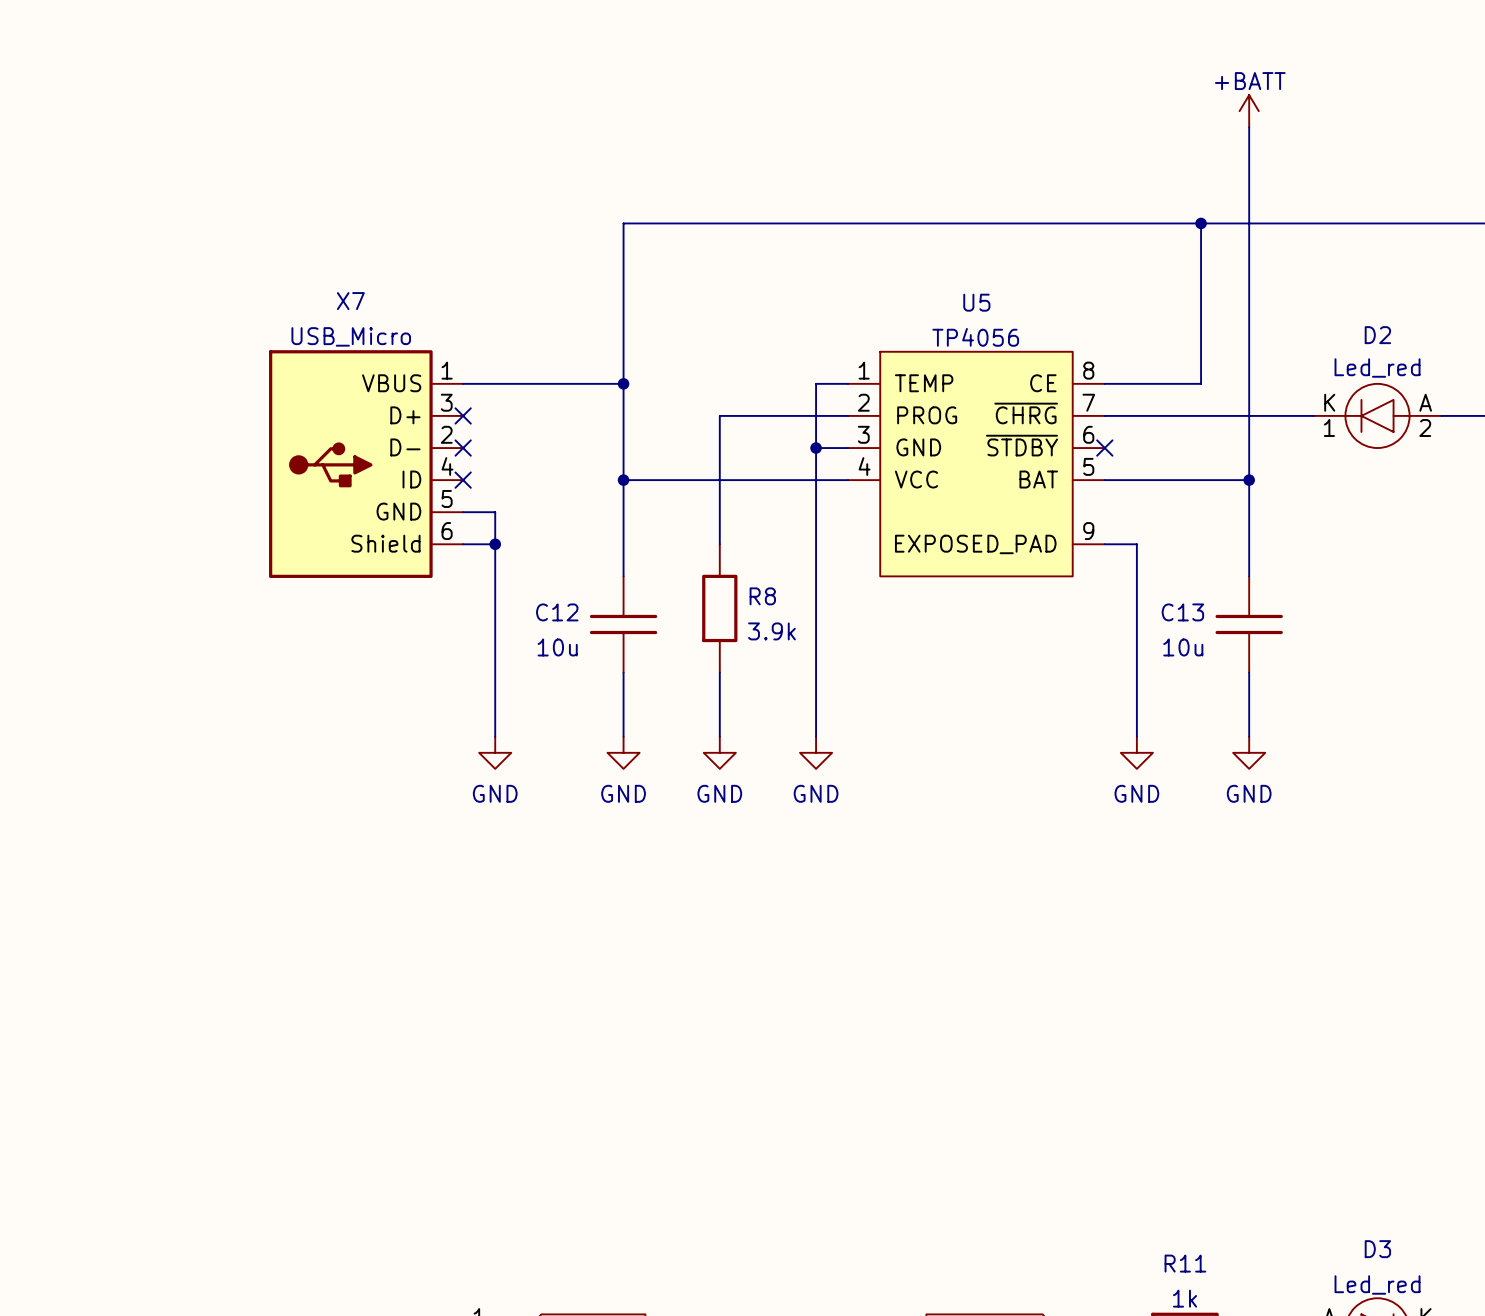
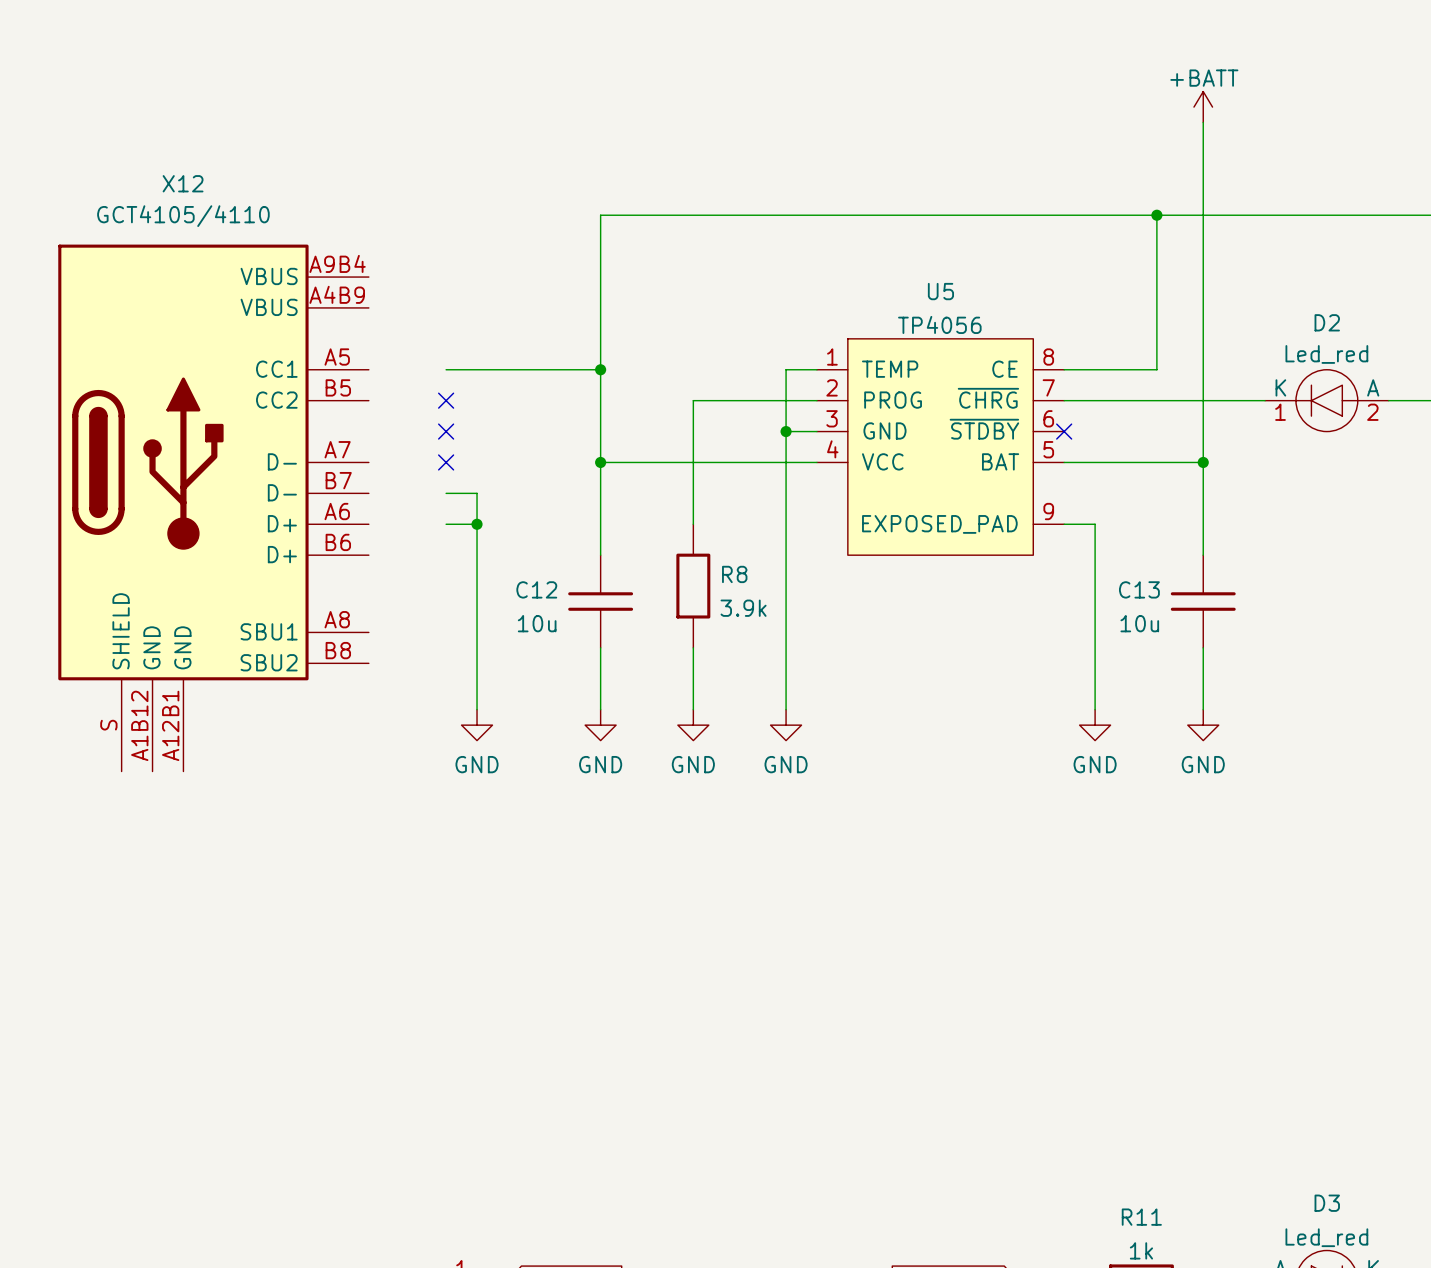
X7: USB_Micro (366, 464) -> none
X12: none -> GCT4105/4110 (213, 508)

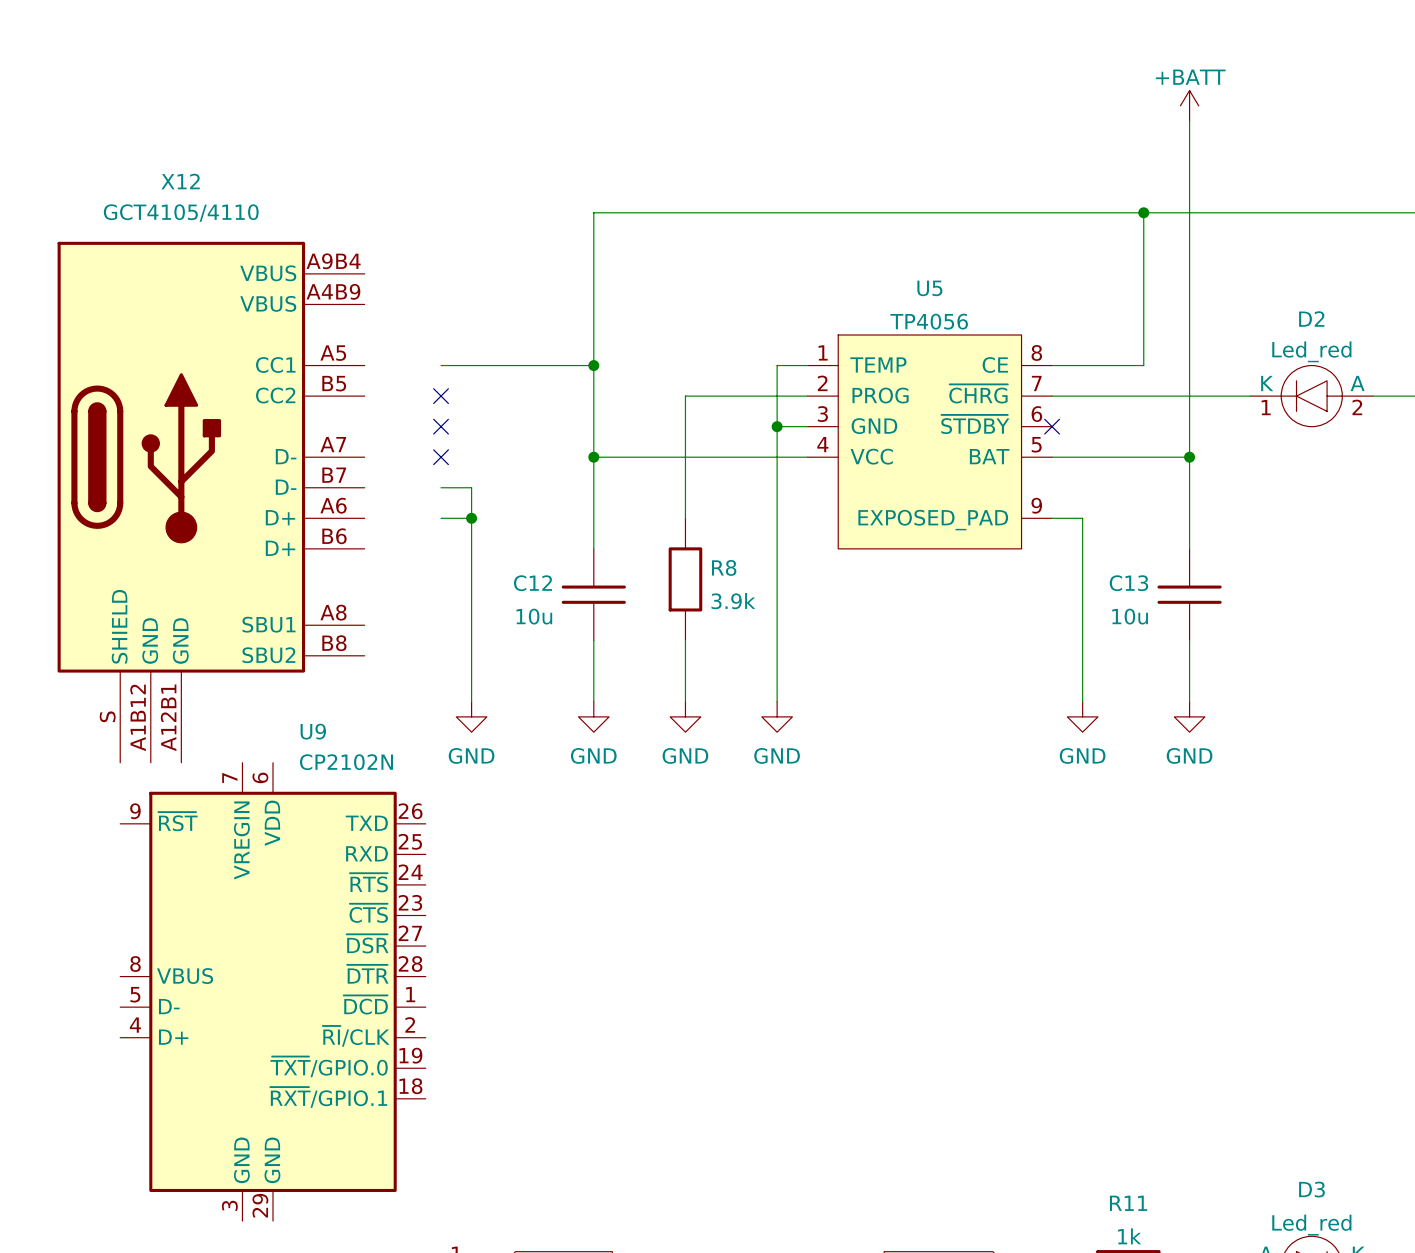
U9: none -> CP2102N (273, 991)

